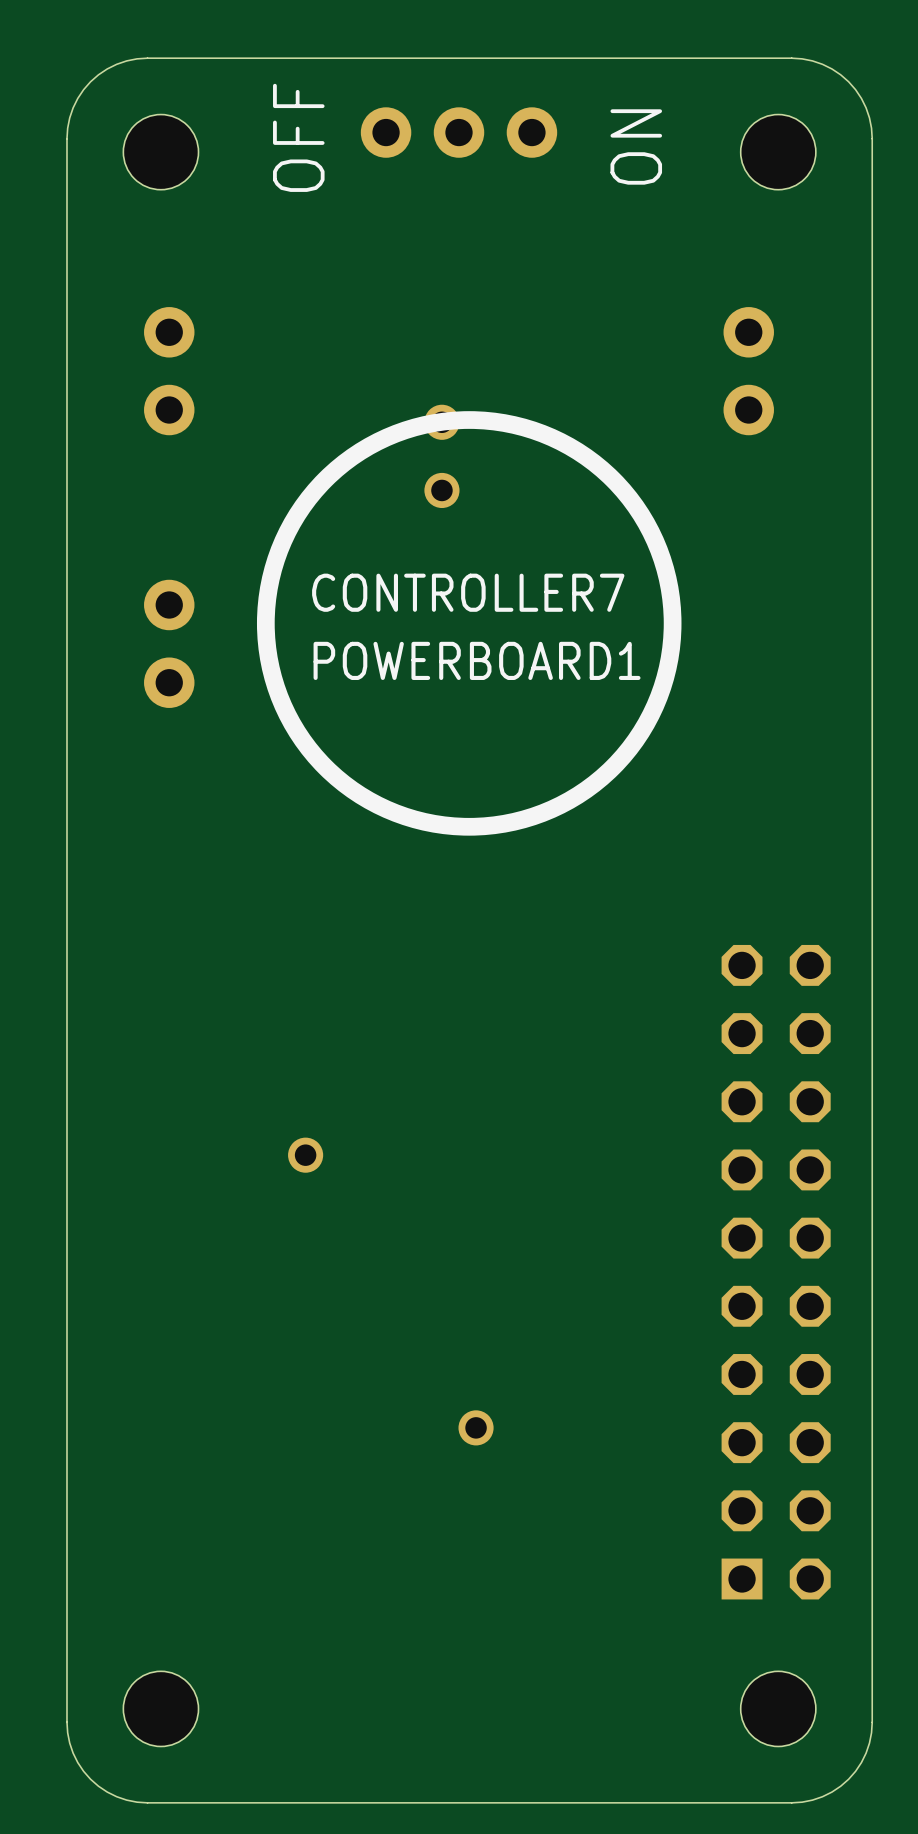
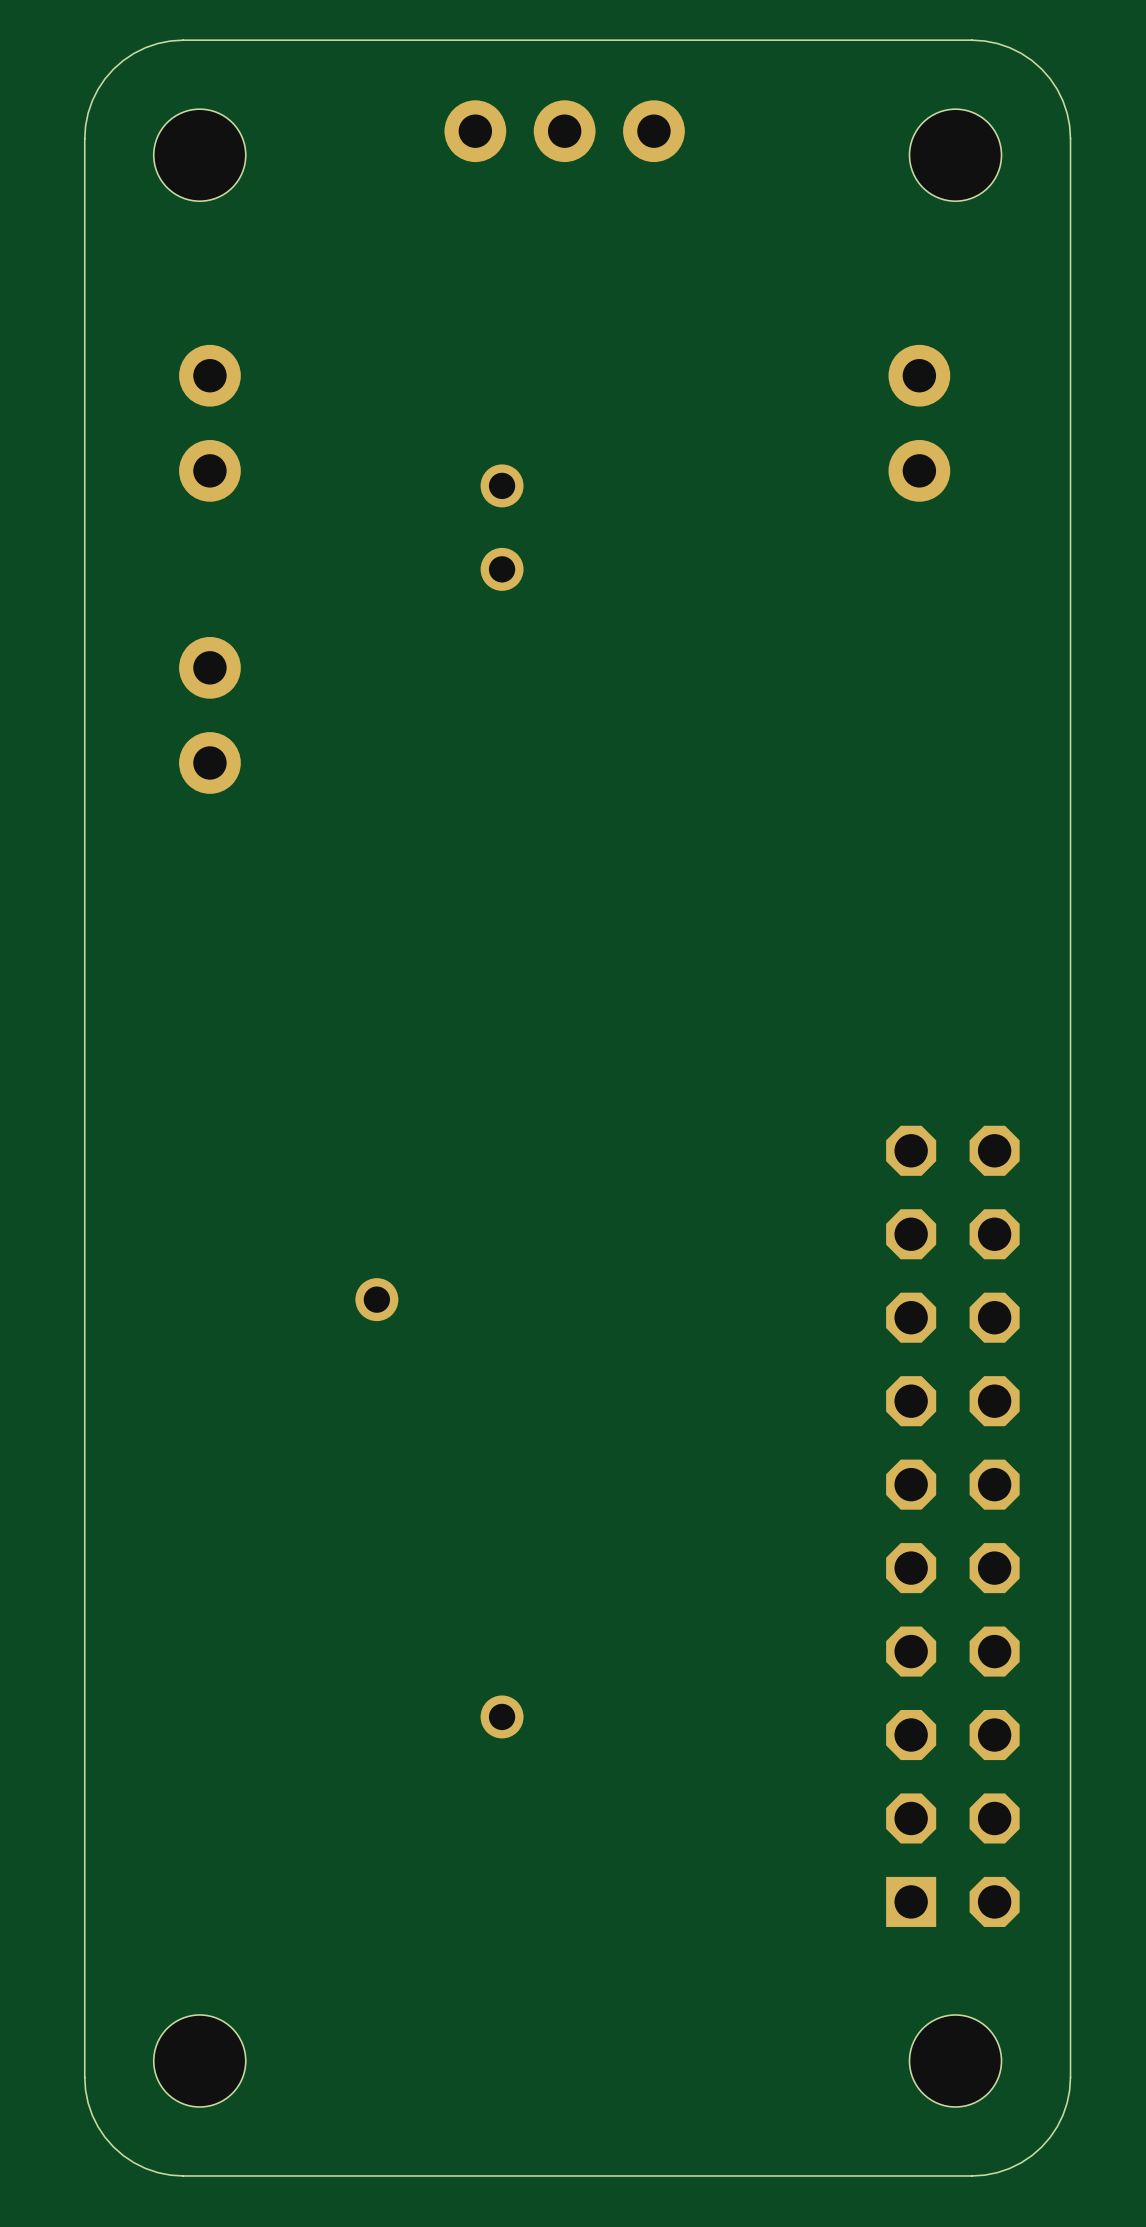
text: OFF (298, 137) -> none
text: ON (636, 146) -> none
drawing: [256, 411, 682, 836] -> none
part position: (441, 456) -> (502, 527)
text: CONTROLLER7 (468, 592) -> none
part position: (169, 643) -> (209, 715)
text: POWERBOARD1 (477, 660) -> none
part position: (305, 1155) -> (376, 1299)
part position: (476, 1427) -> (502, 1716)

